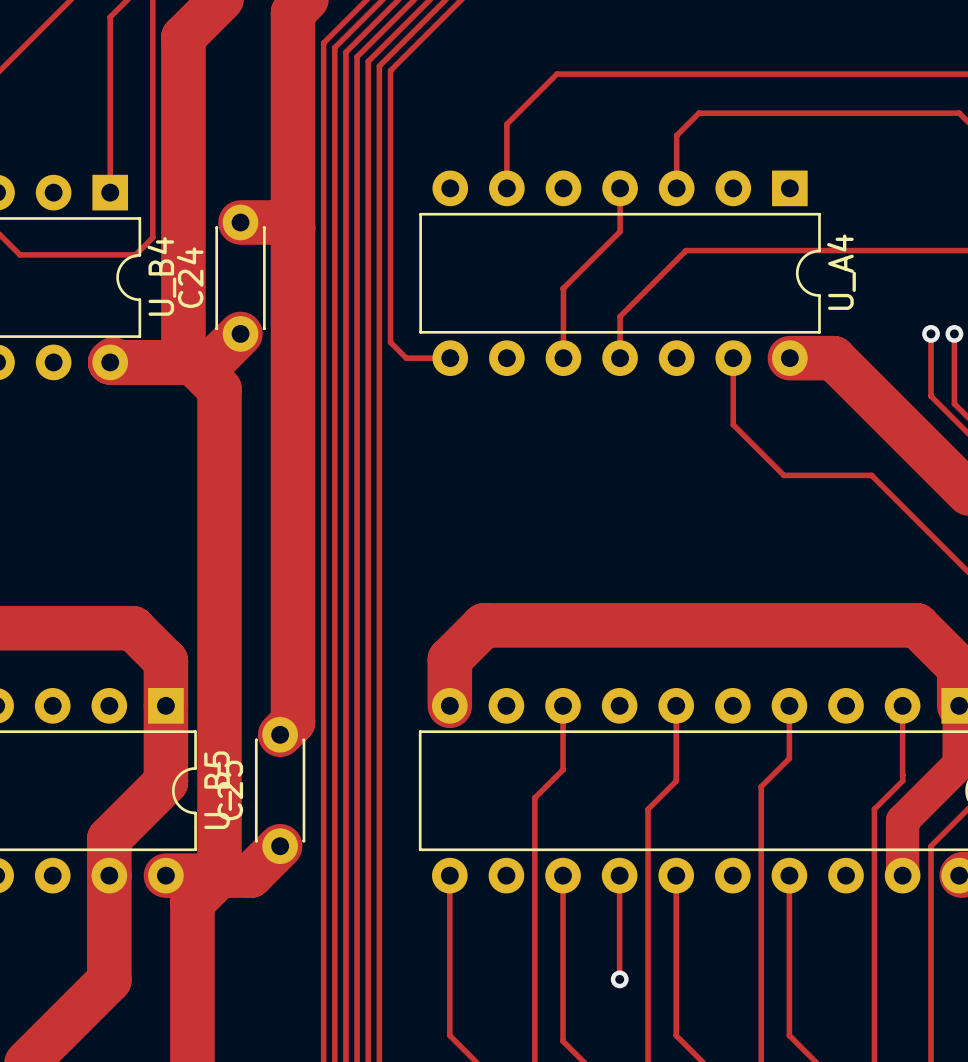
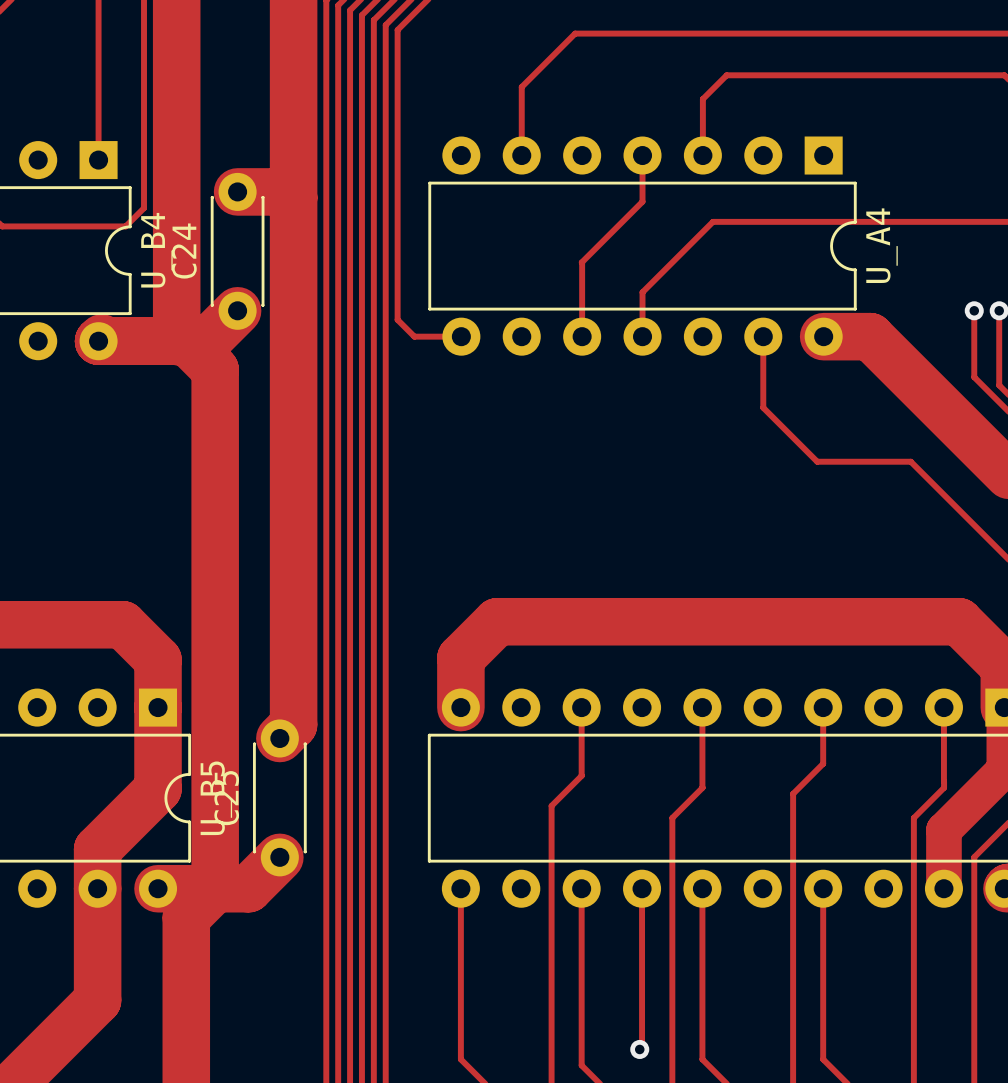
track: none -> (642, 999) (642, 1047) (639, 1049)
via position: (619, 979) -> (639, 1049)

